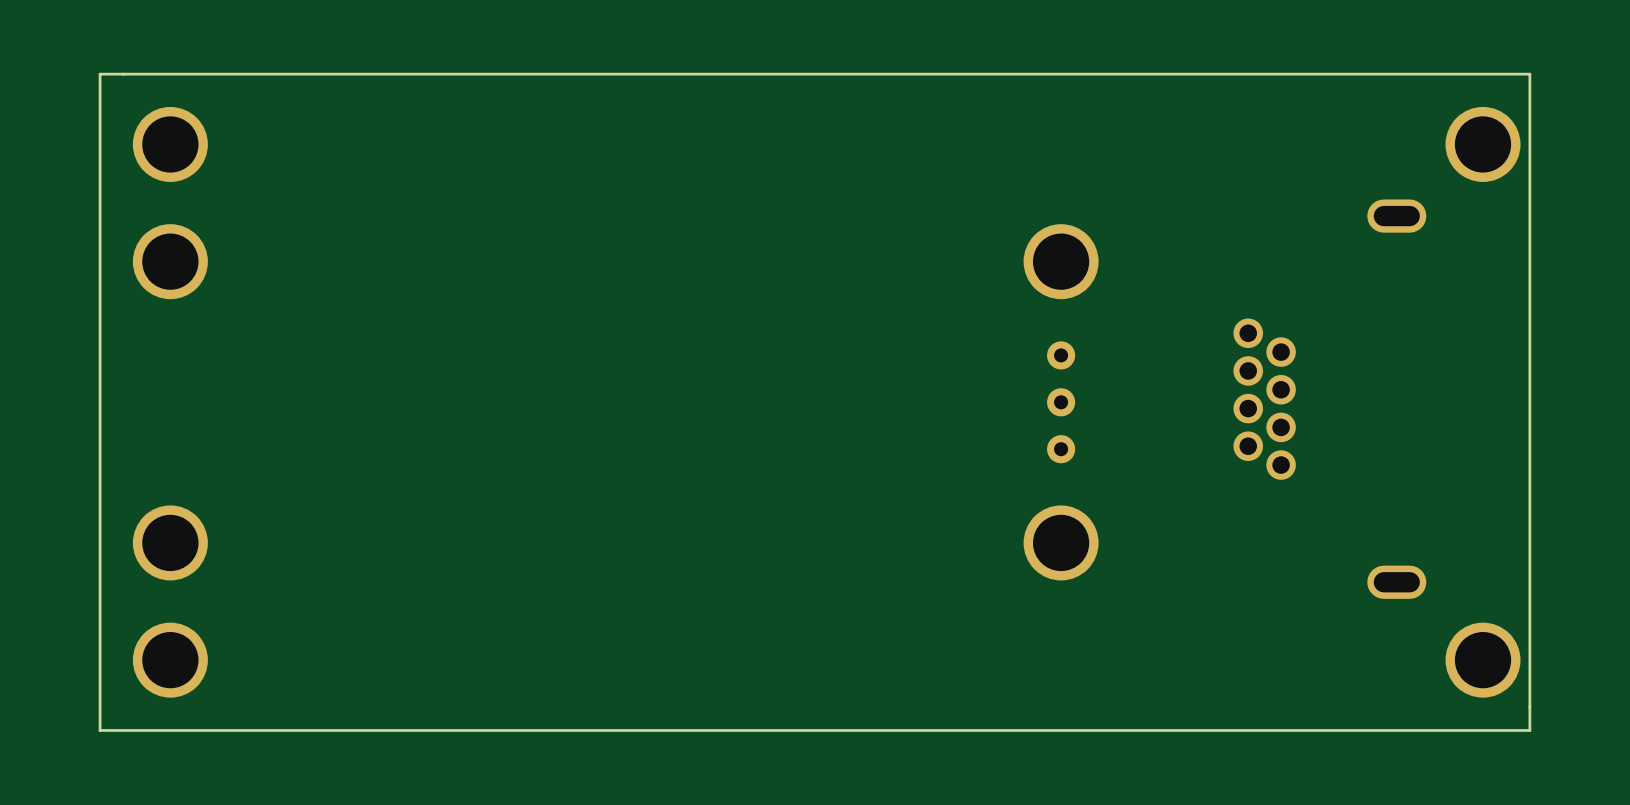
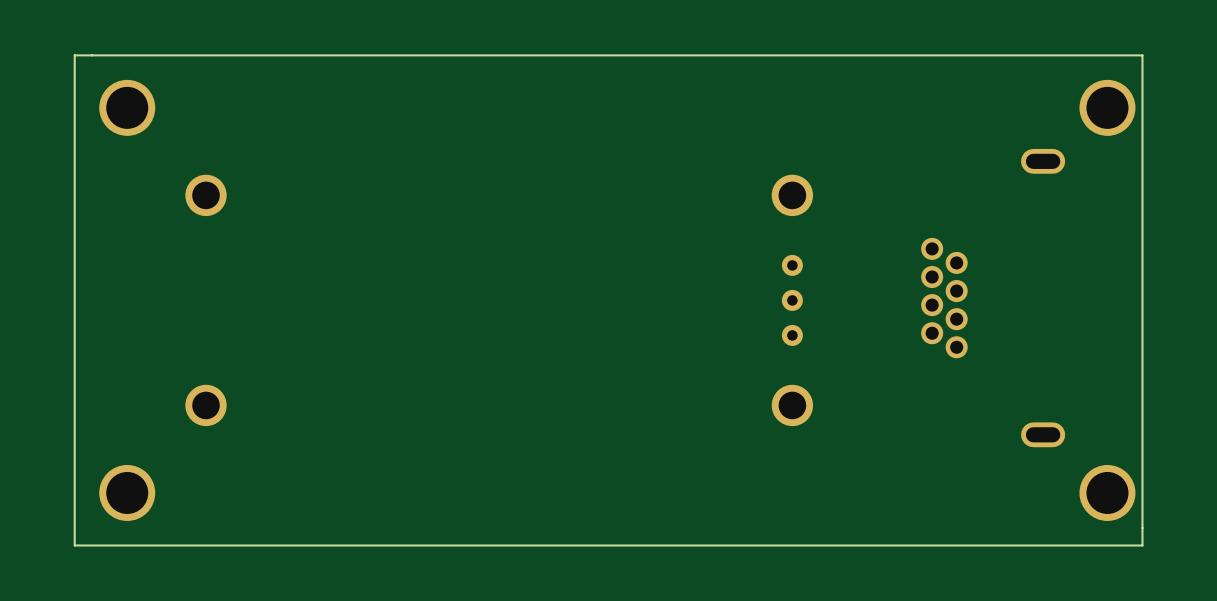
part footprint: [1023, 224, 1099, 300] -> [771, 174, 814, 217]
part: (170, 261) -> none
part: none -> (206, 195)
part footprint: [1023, 505, 1099, 581] -> [771, 384, 814, 427]
part: (170, 542) -> none
part: none -> (206, 405)

